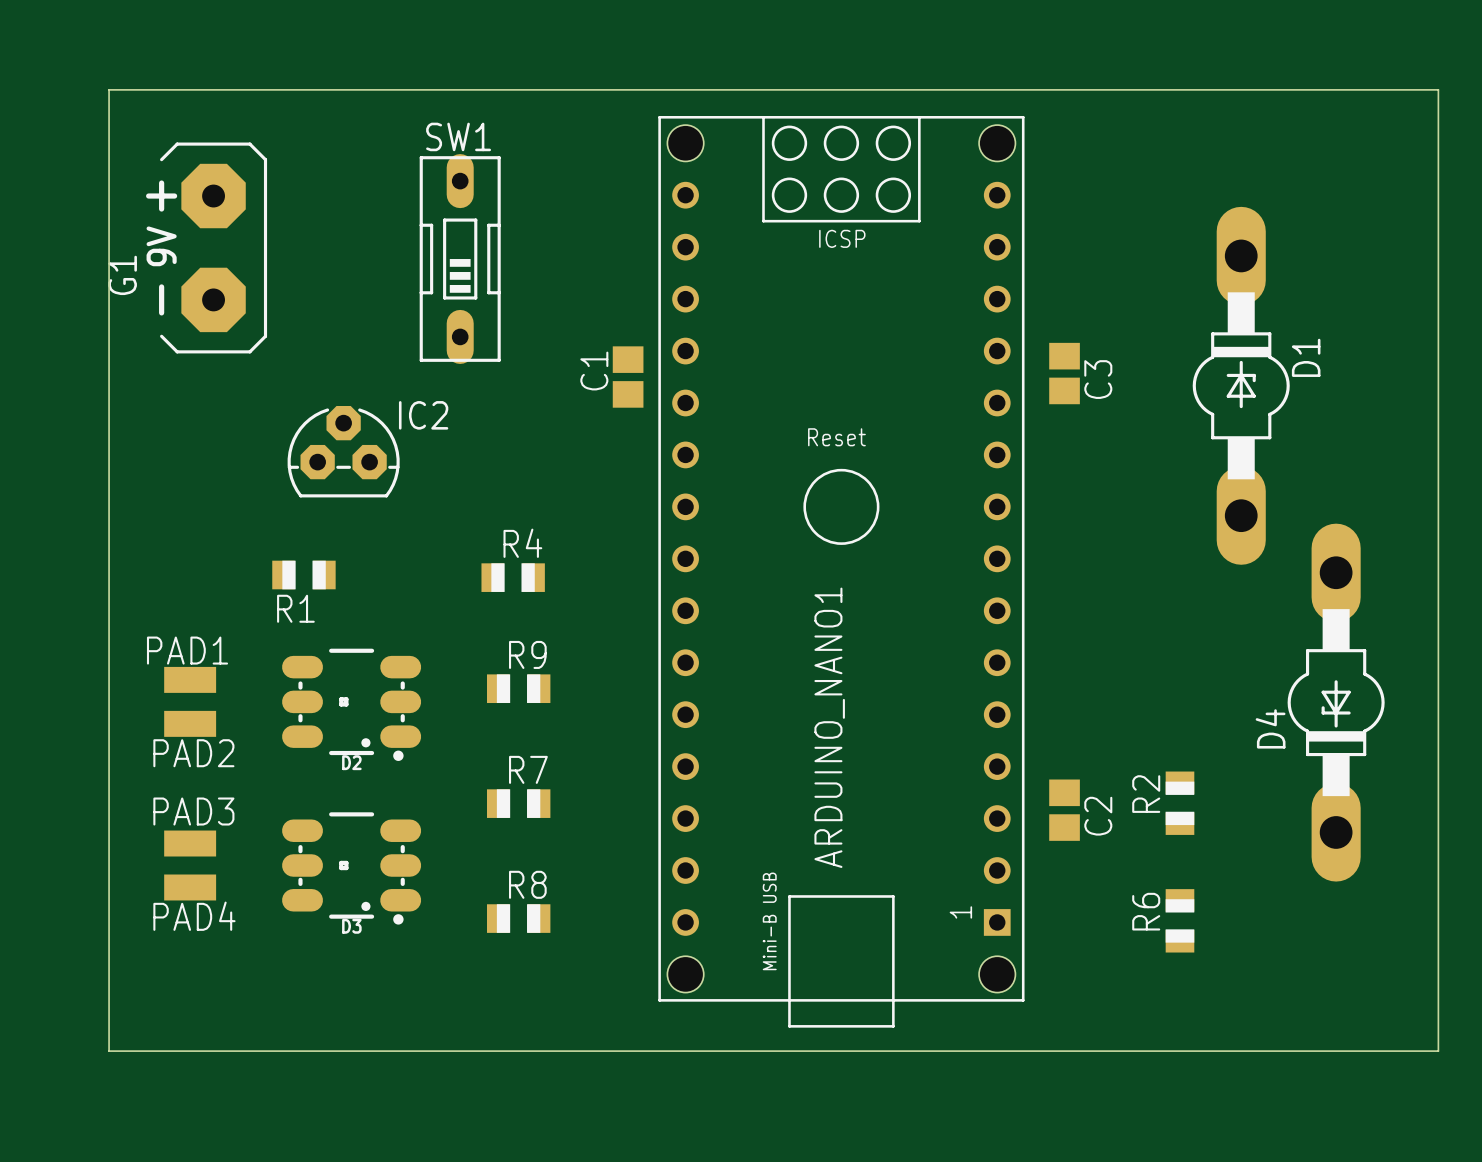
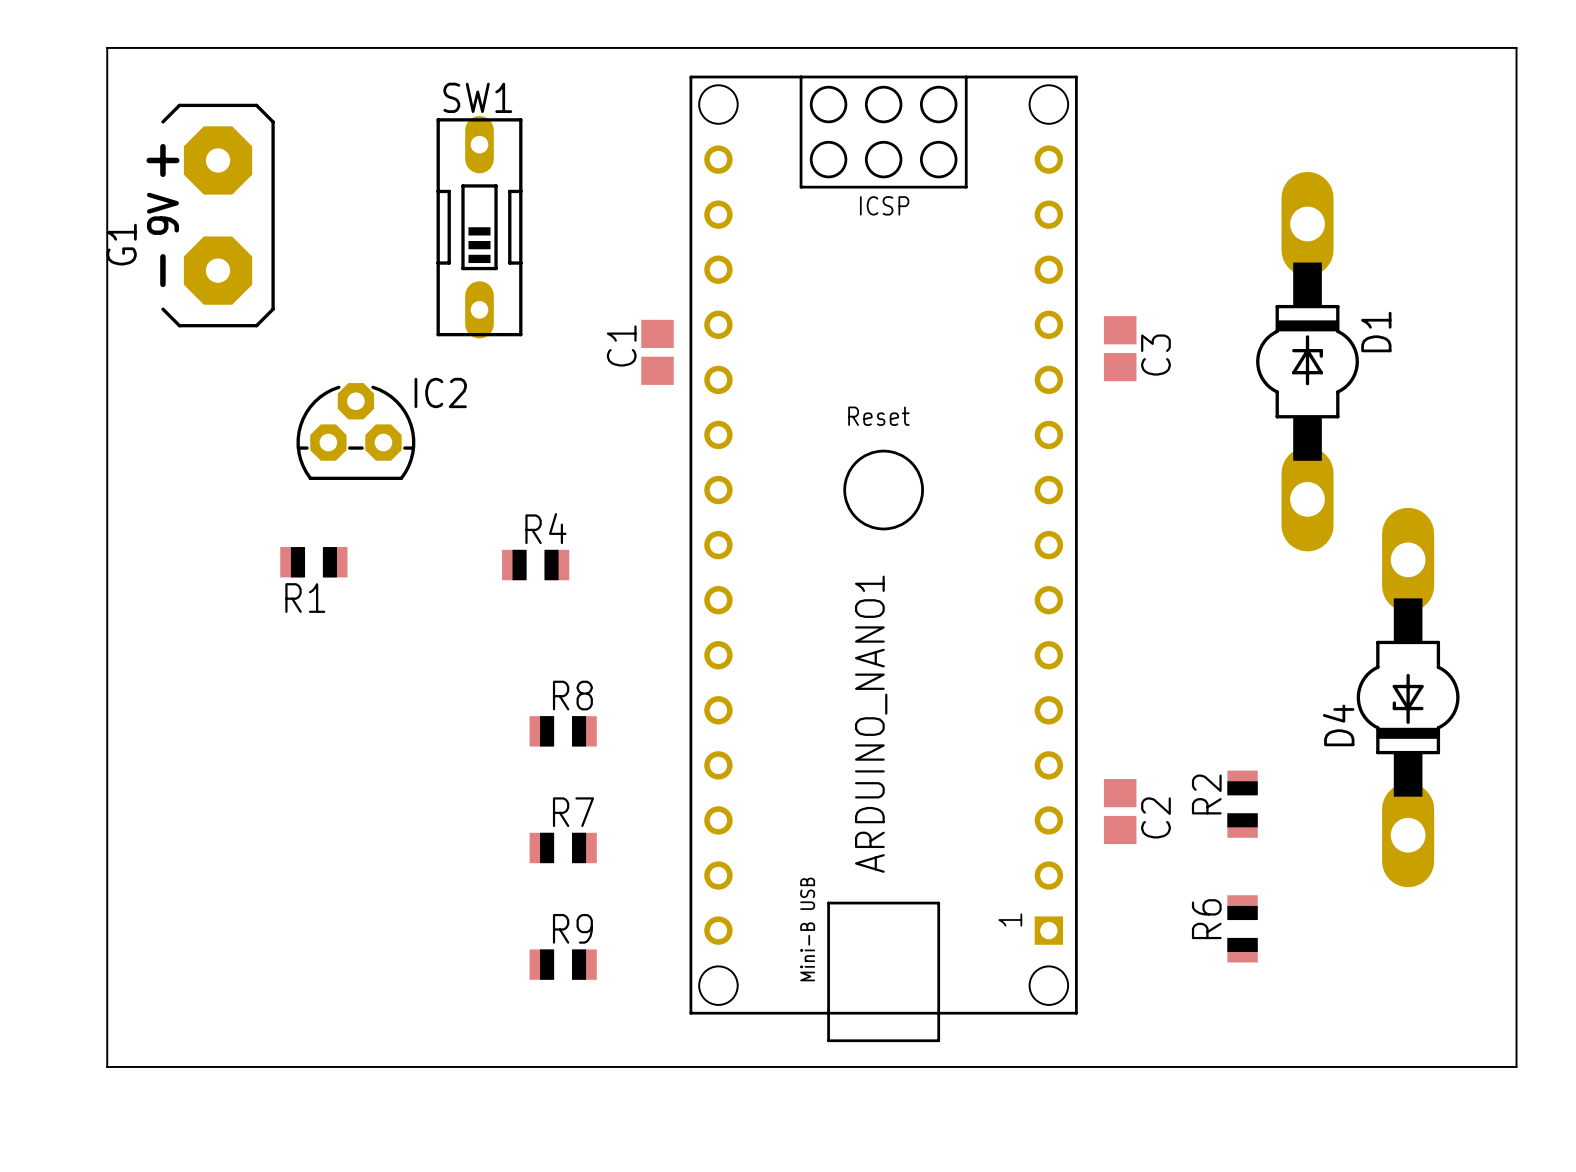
PAD1: (190, 679) -> none
R9 position: (518, 688) -> (563, 964)
D2: (351, 704) -> none
PAD2: (190, 723) -> none
R7 position: (518, 803) -> (563, 847)
PAD3: (190, 843) -> none
D3: (351, 868) -> none
PAD4: (190, 887) -> none
R8 position: (518, 918) -> (563, 731)

